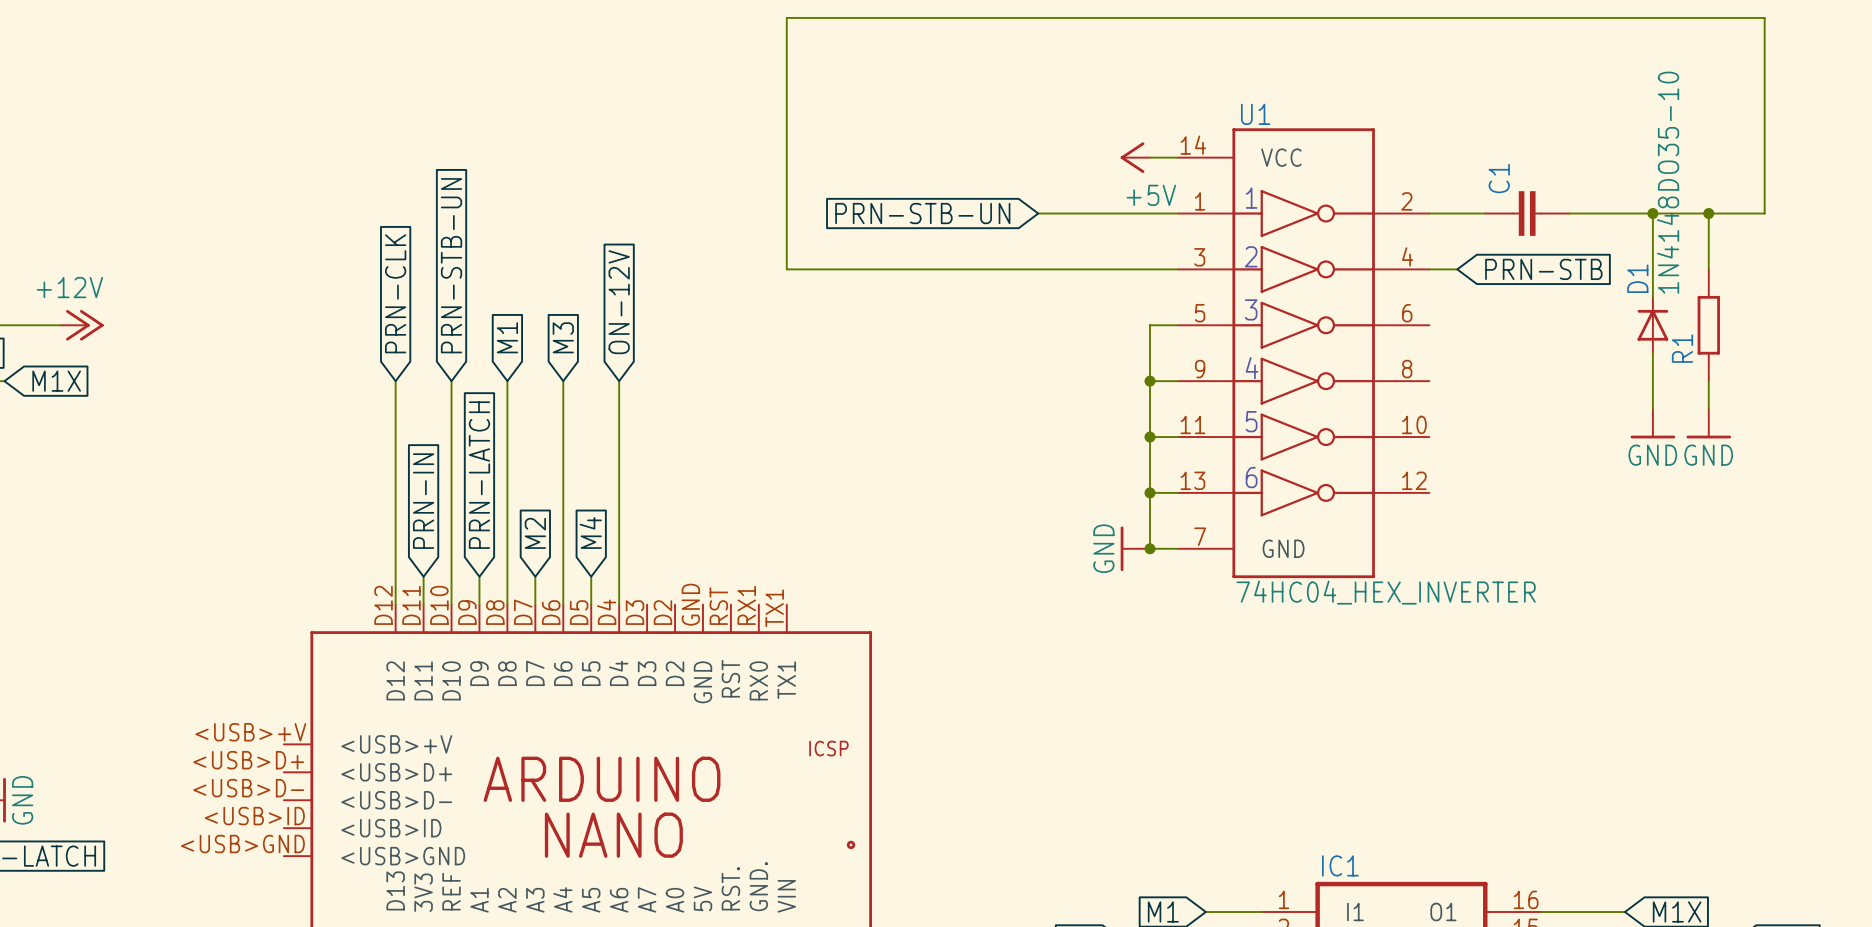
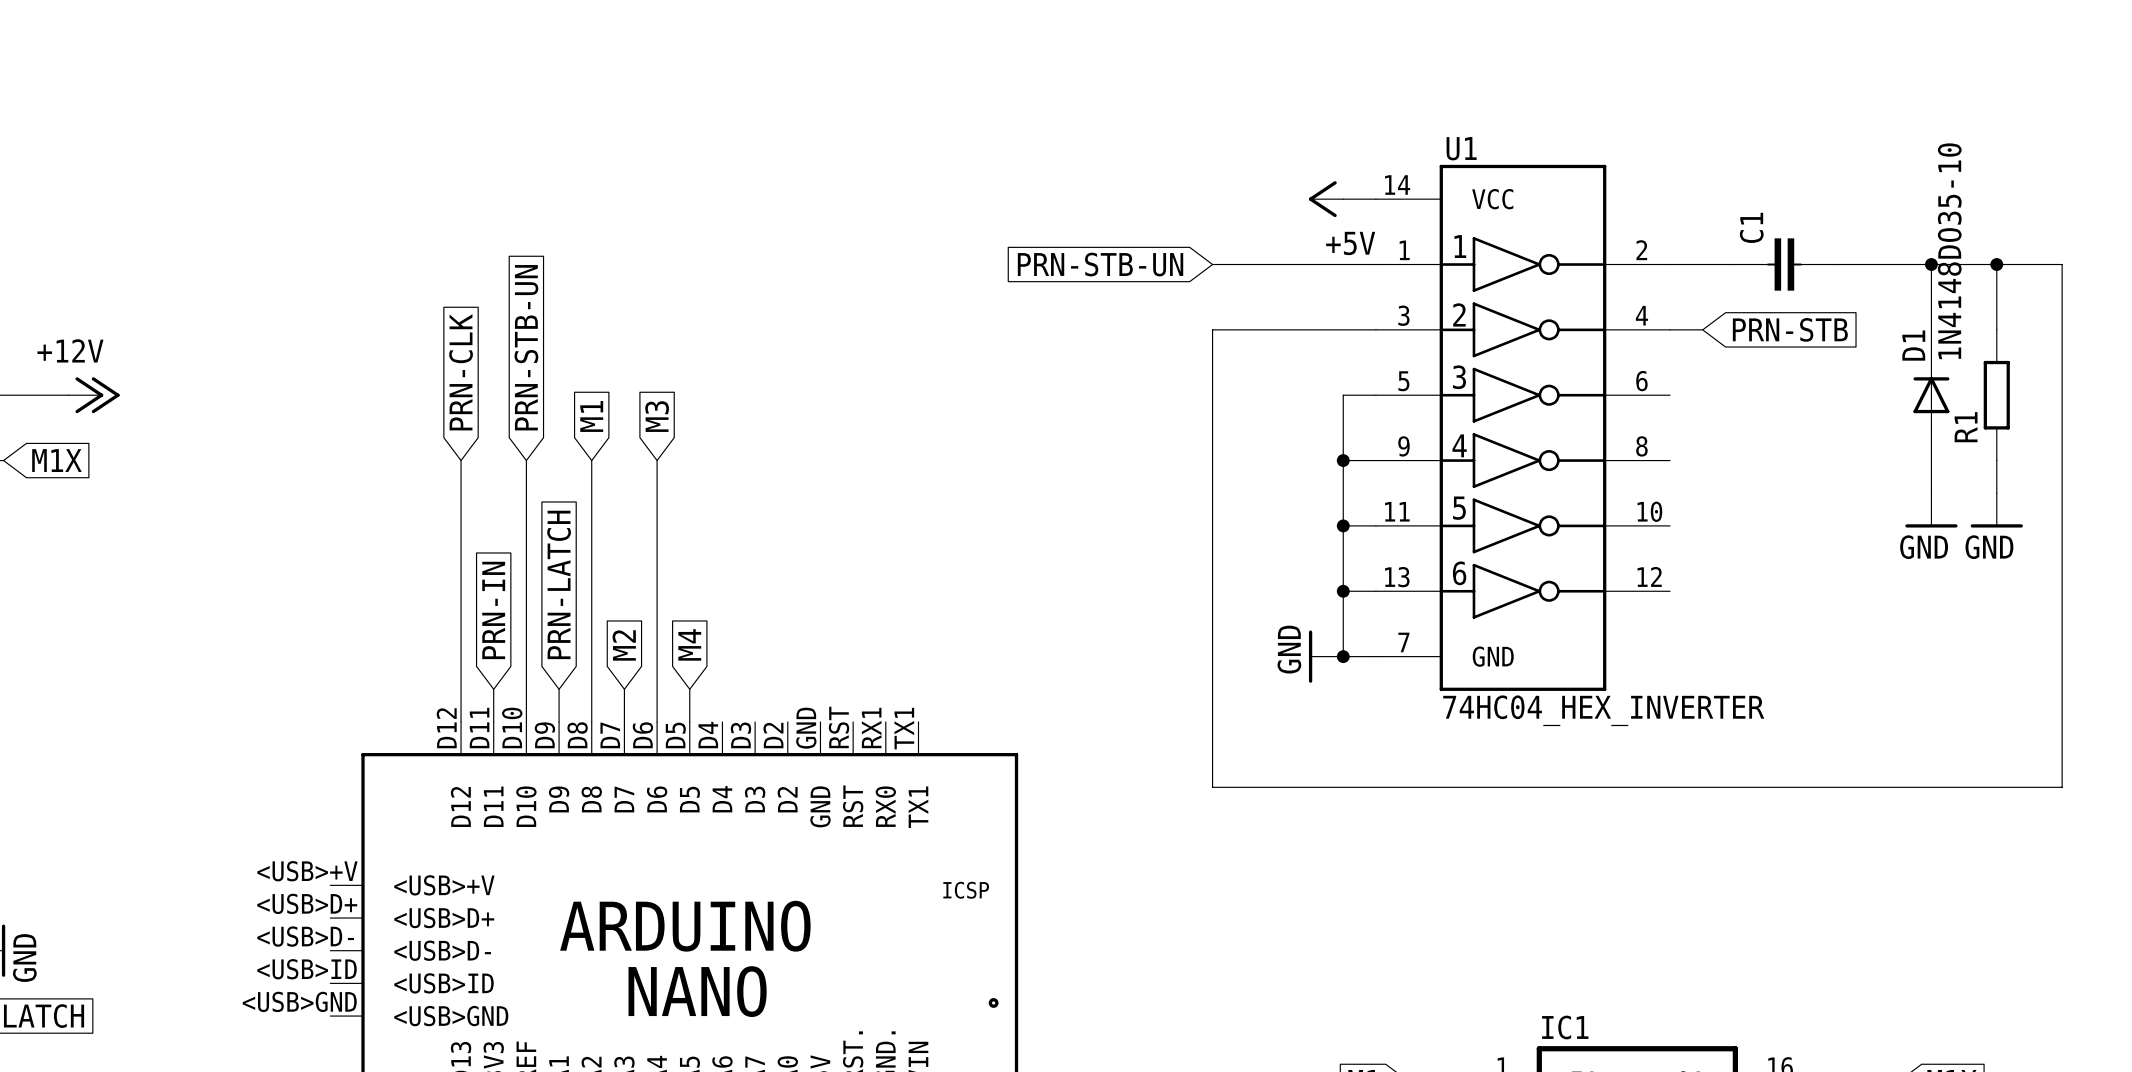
wire: (1764, 213) (1764, 17) (786, 17) (786, 269) (1038, 269) -> (2062, 264) (2062, 787) (1212, 787) (1212, 329)
global label: ON-12V (619, 302) -> none
wire: (619, 381) (619, 604) -> none

